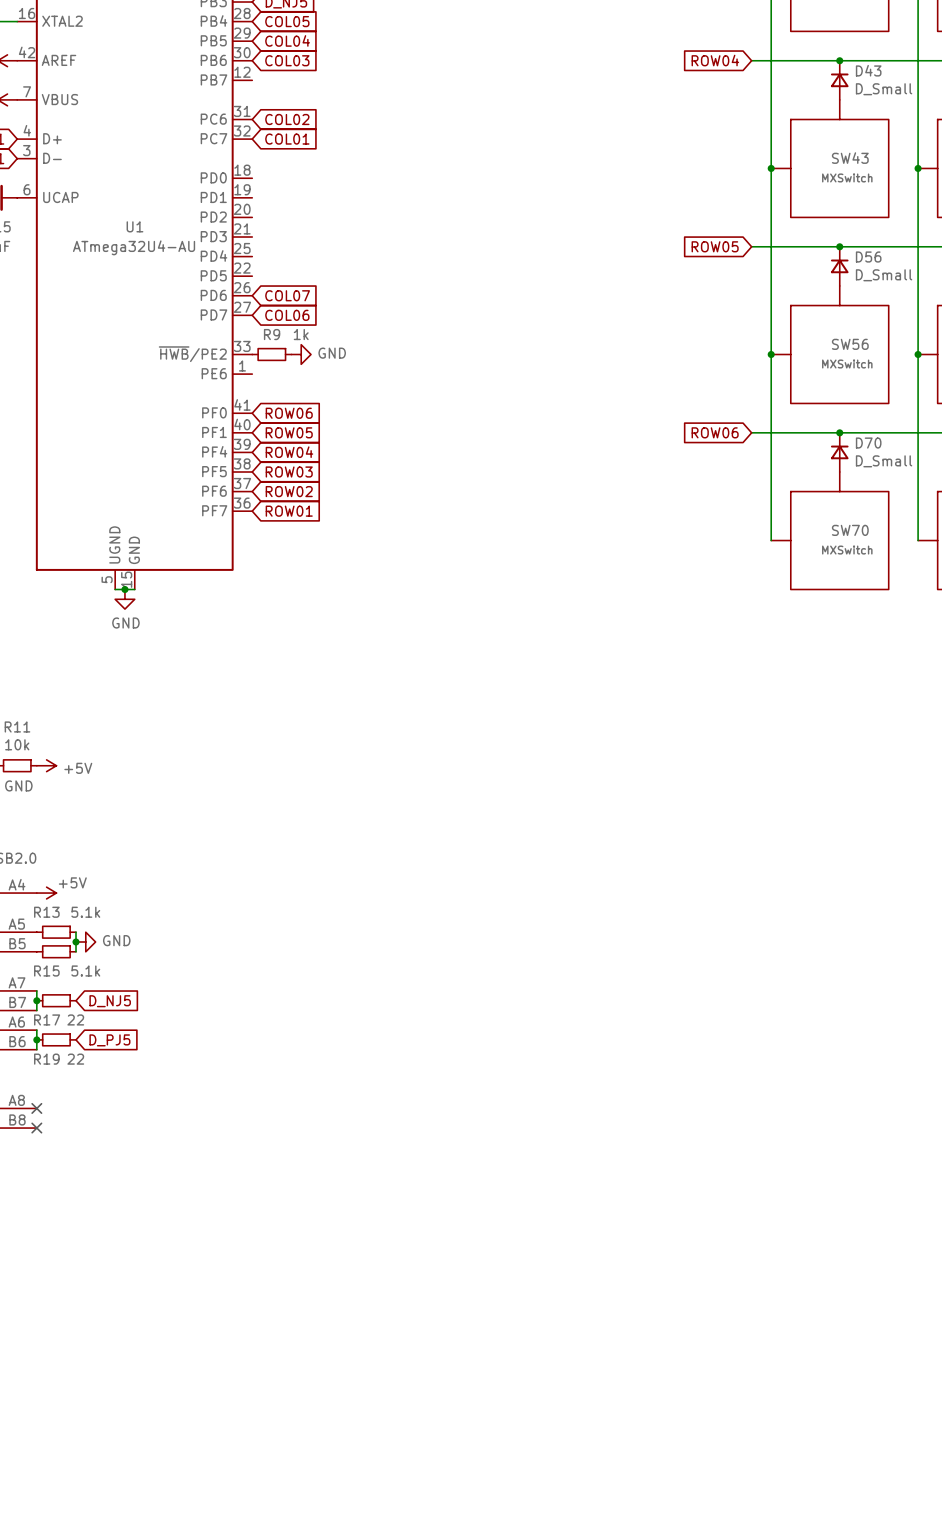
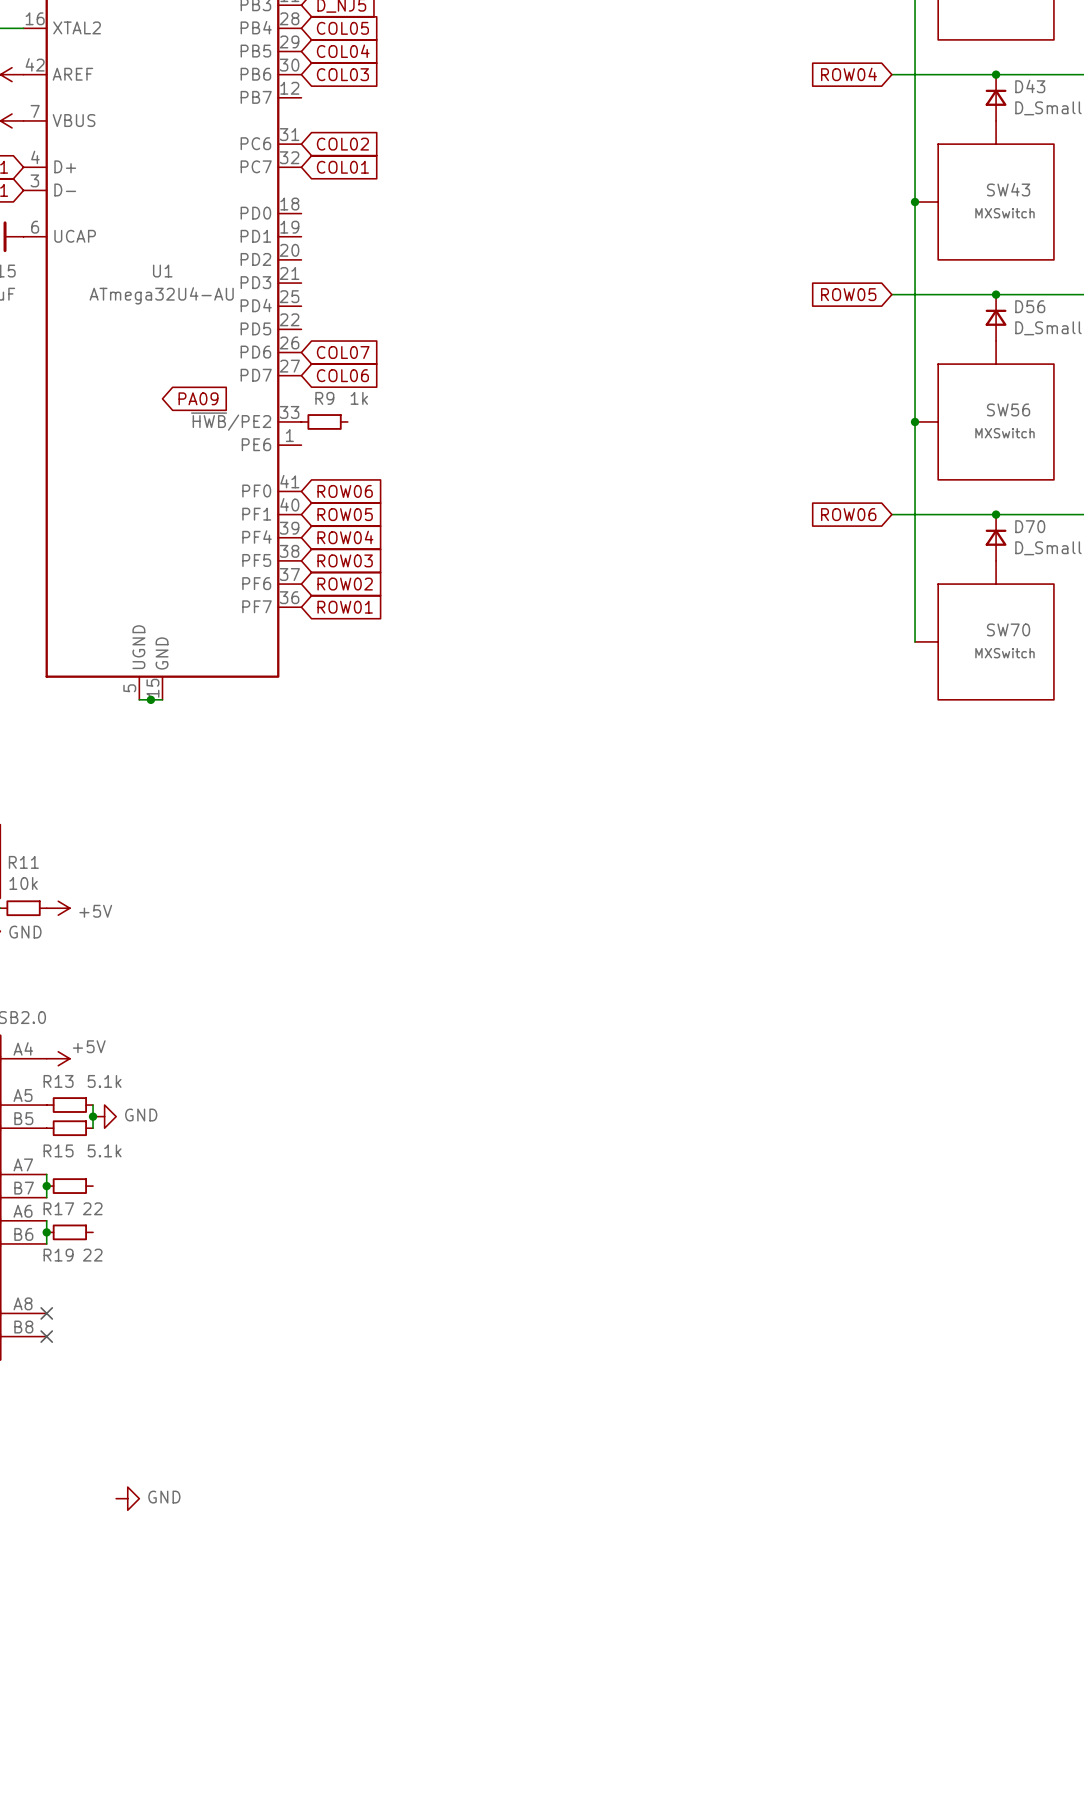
global label: none -> PA09 (198, 398)
power symbol: GND (301, 354) -> none
power symbol: GND (124, 599) -> none
global label: D_NJ5 (110, 1001) -> none
global label: D_PJ5 (109, 1040) -> none
power symbol: none -> GND (127, 1498)

